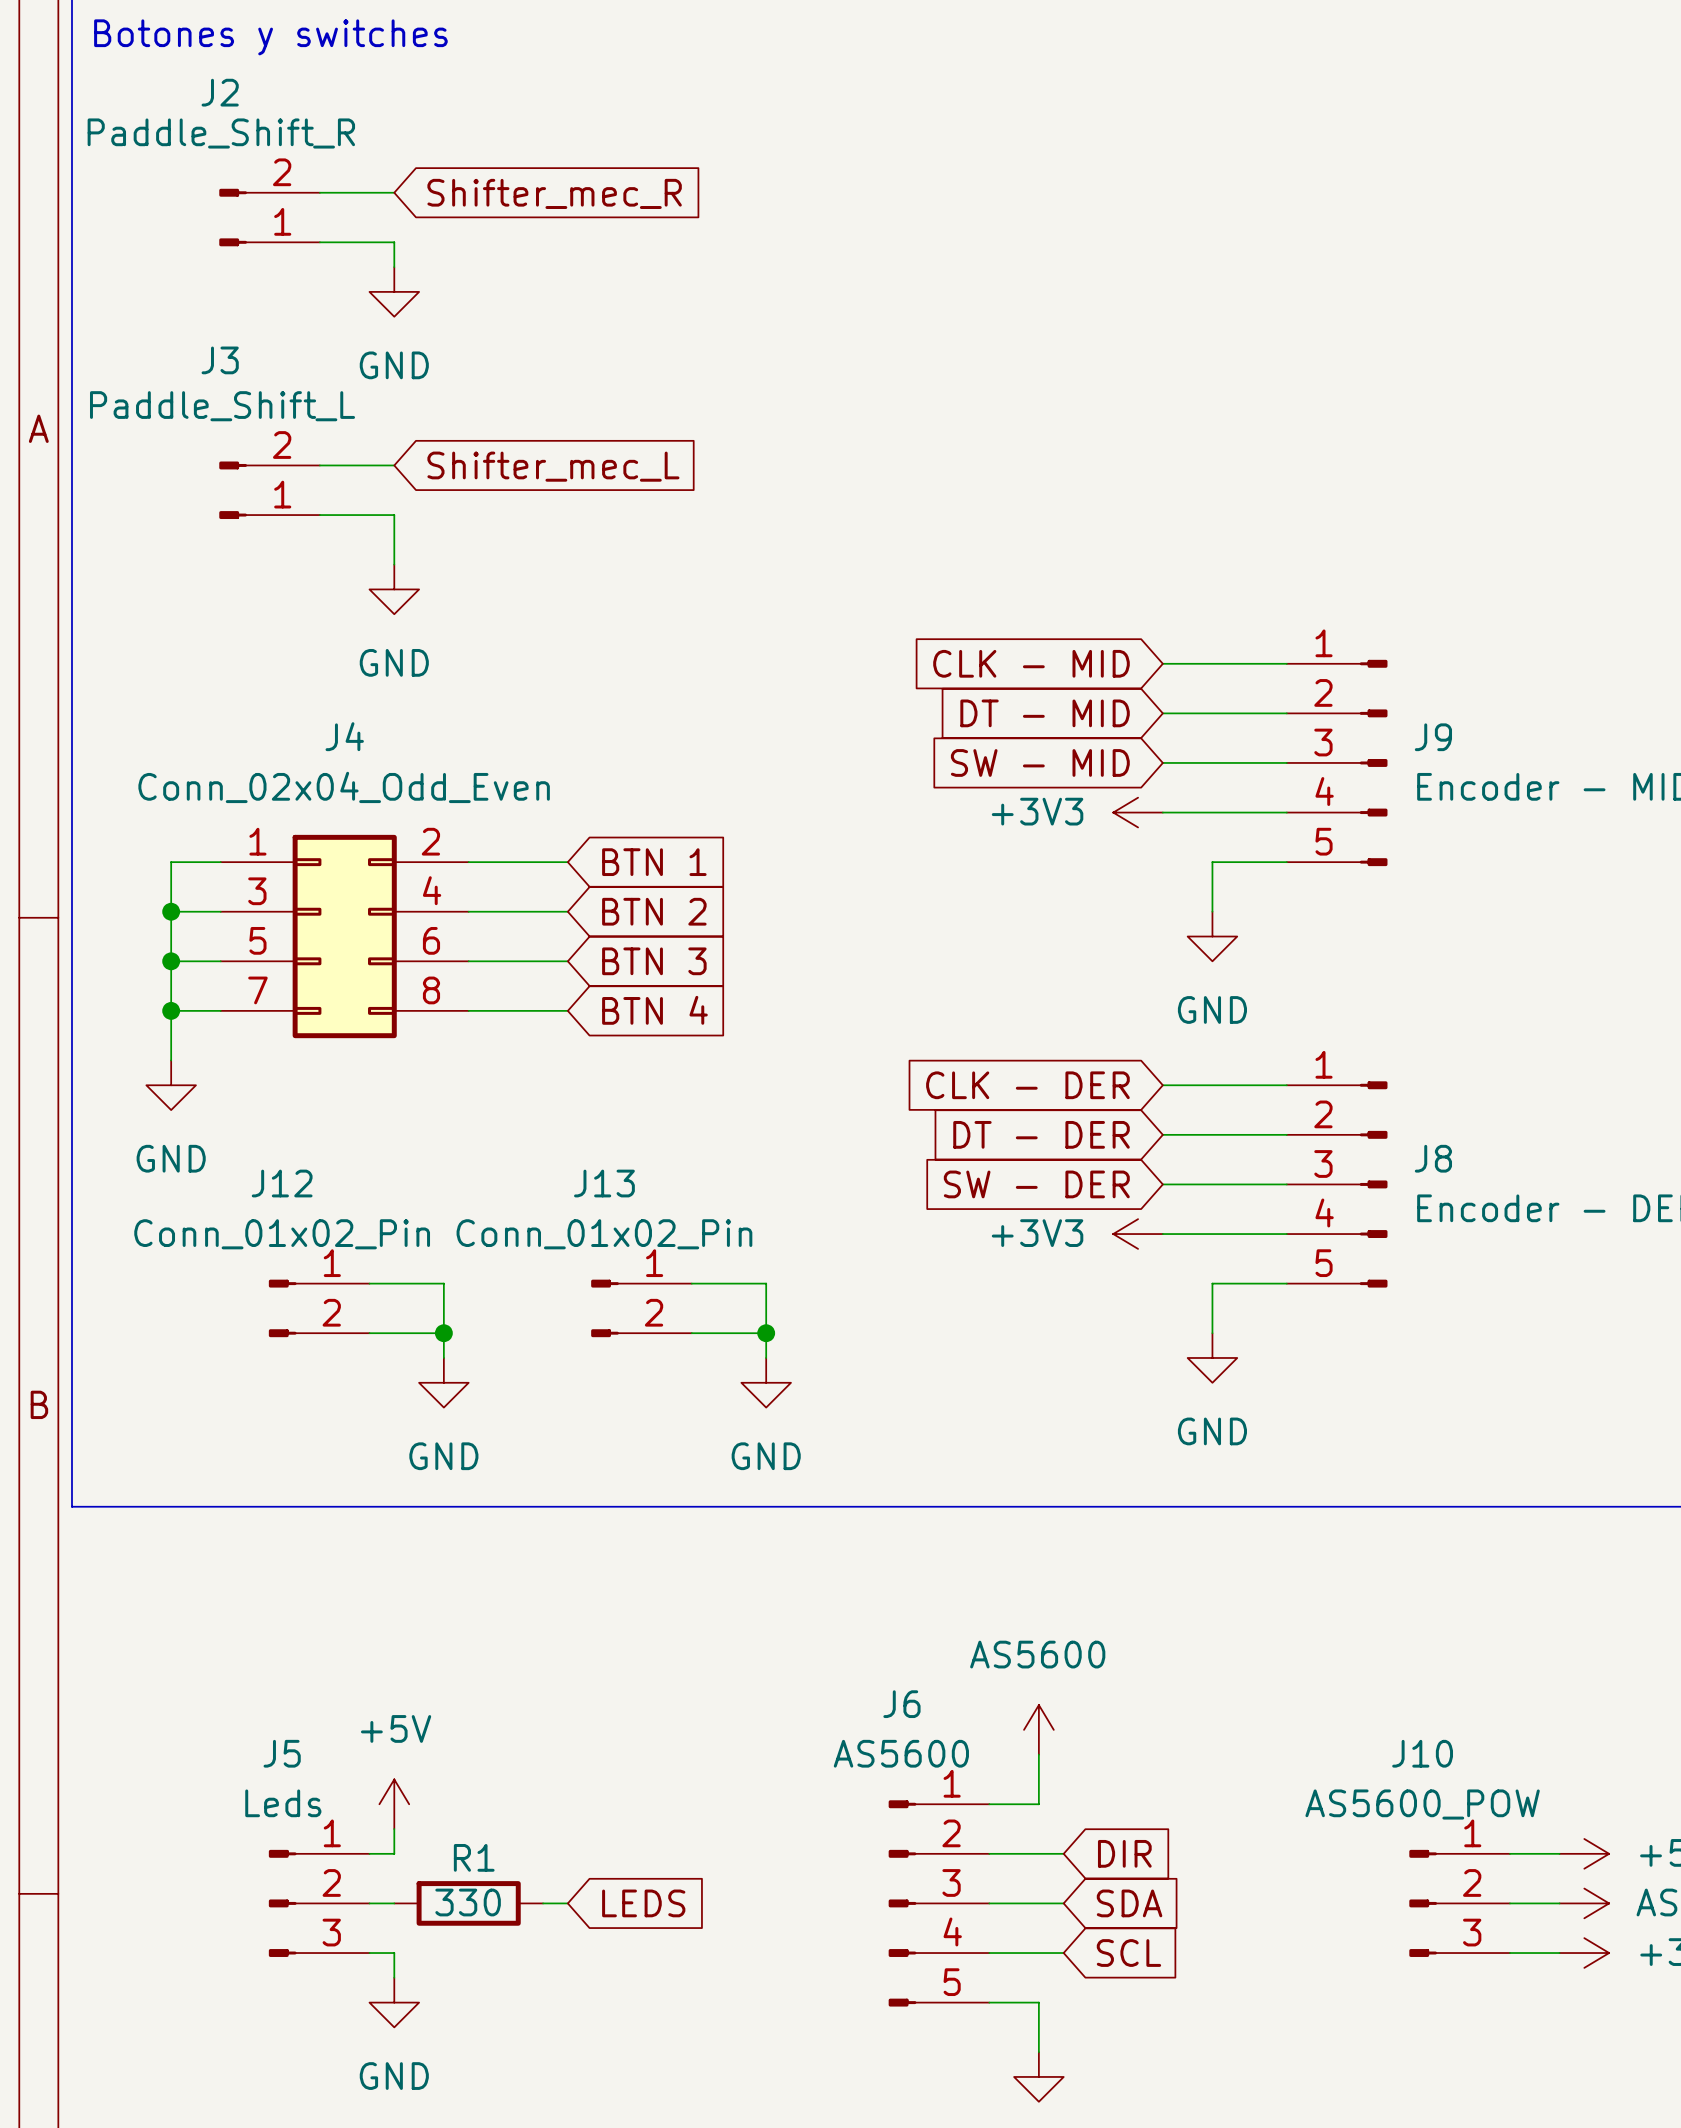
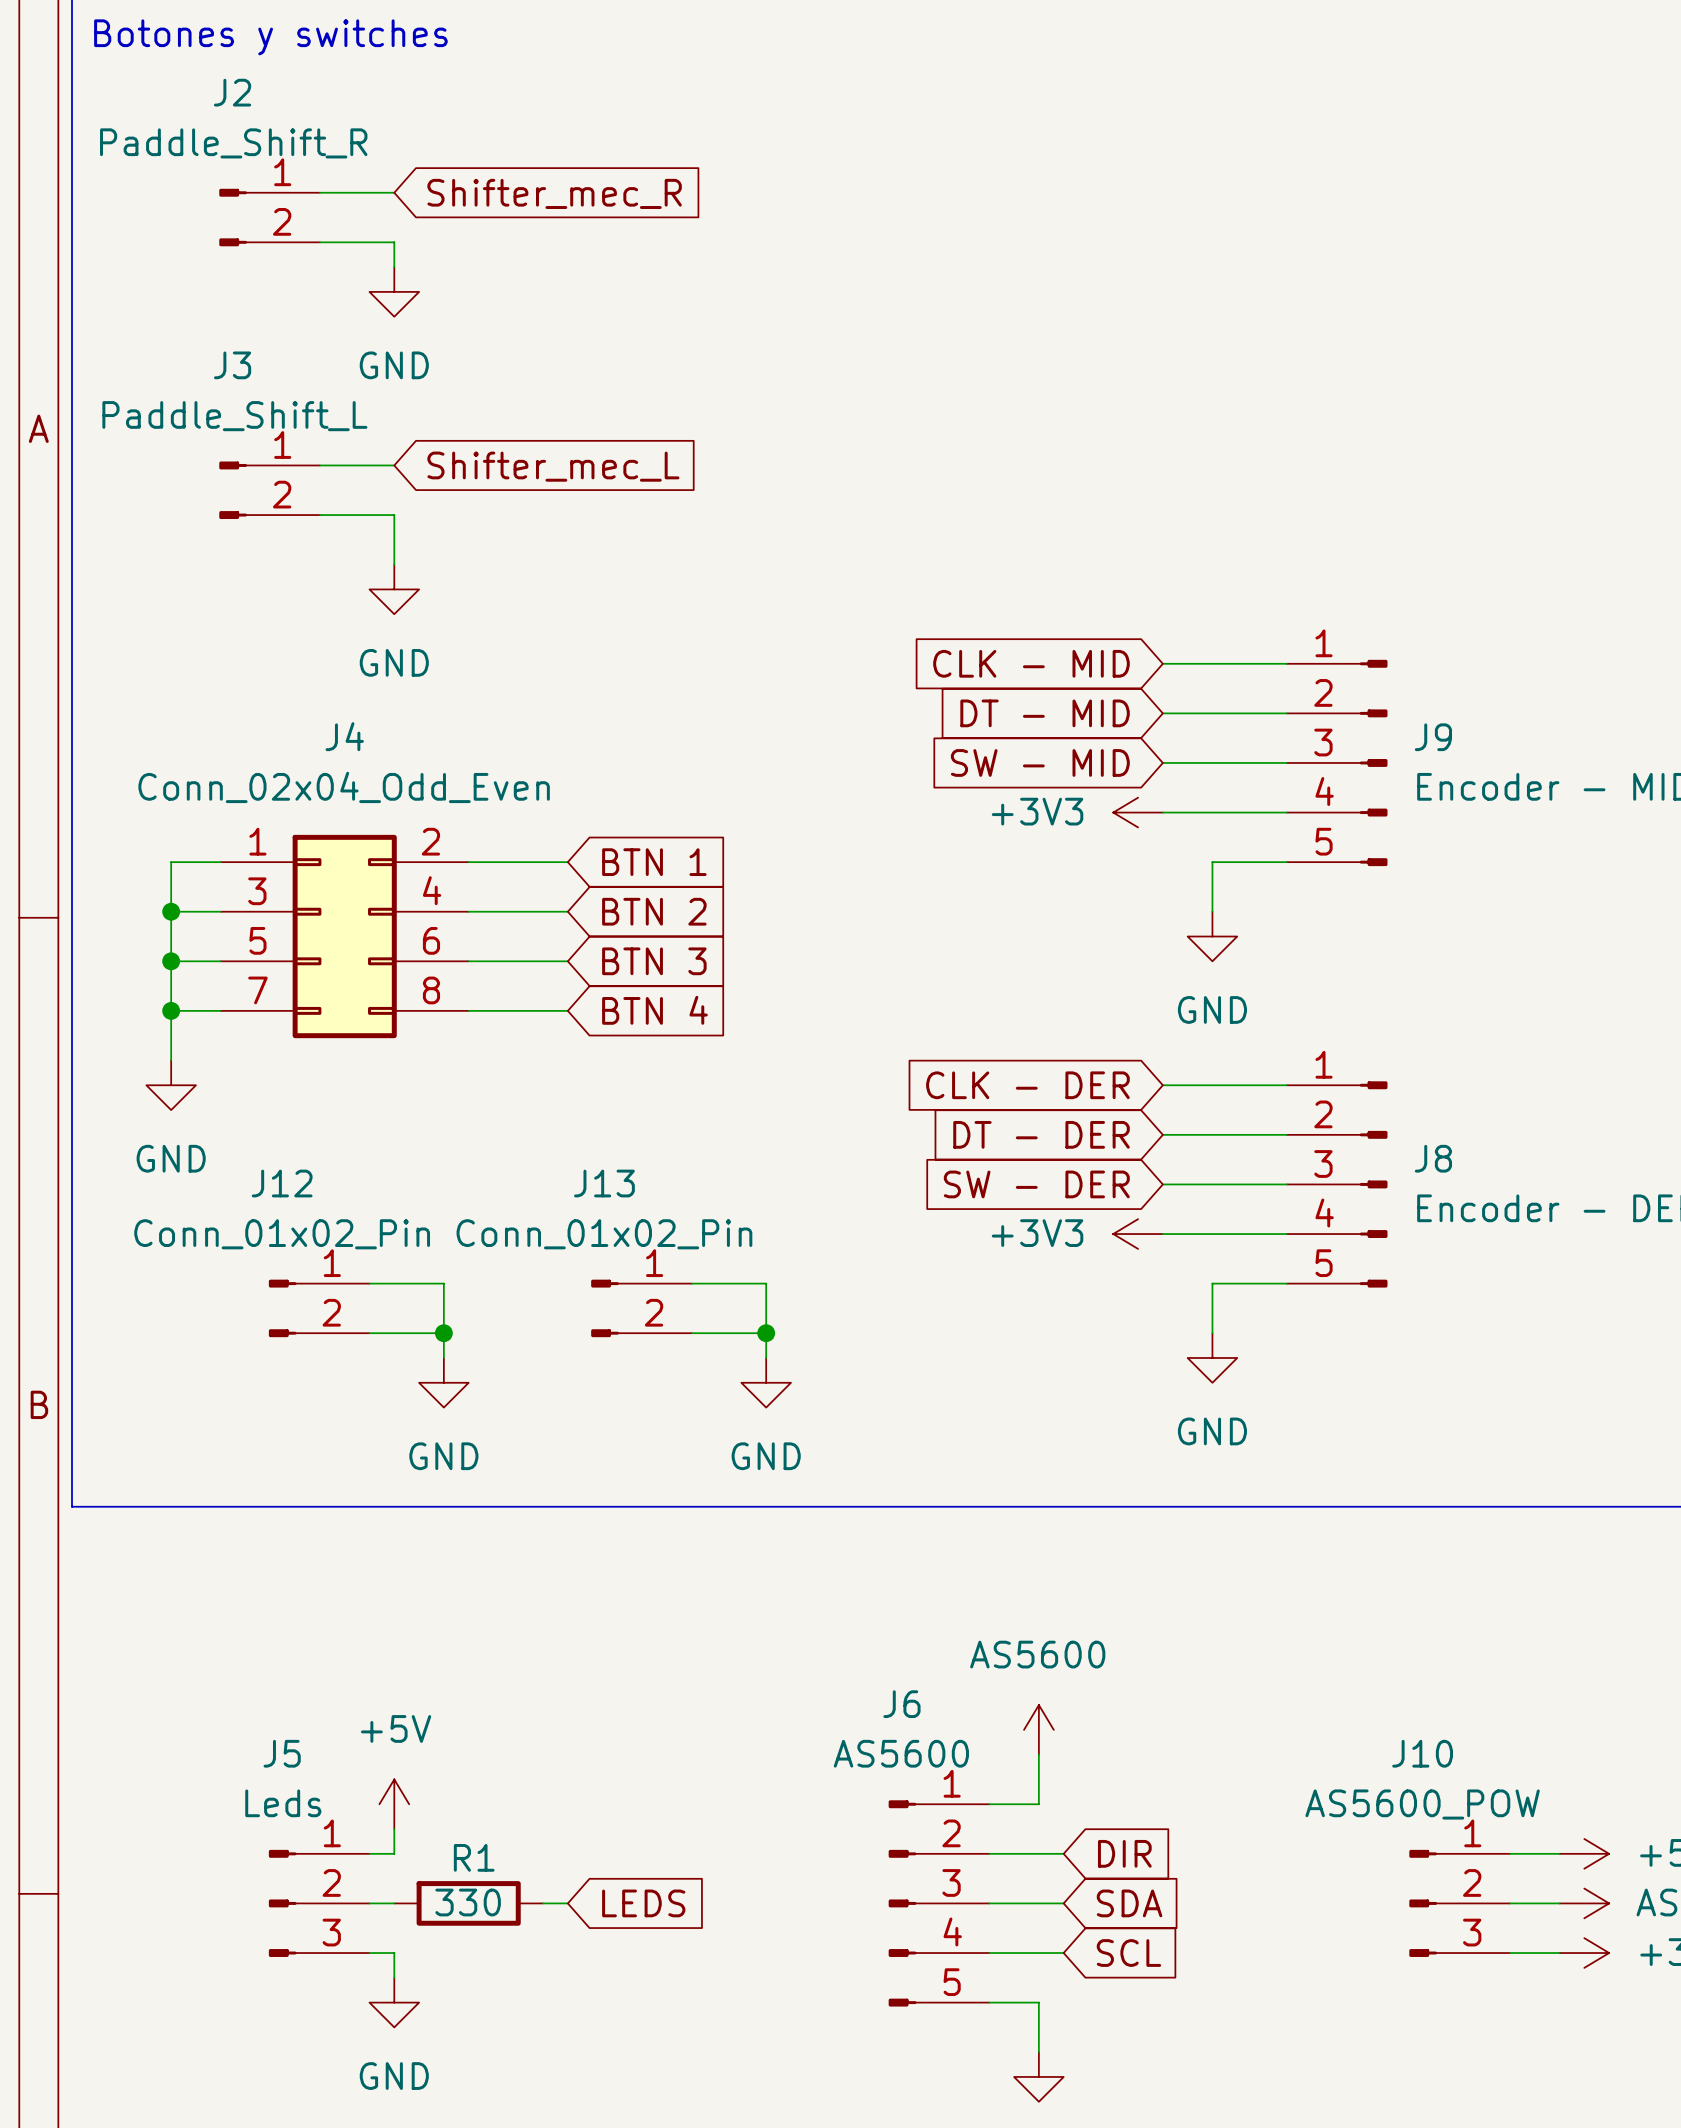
J2 flip: as is (233, 217) -> up-down (233, 217)
J3 flip: as is (233, 490) -> up-down (233, 490)

